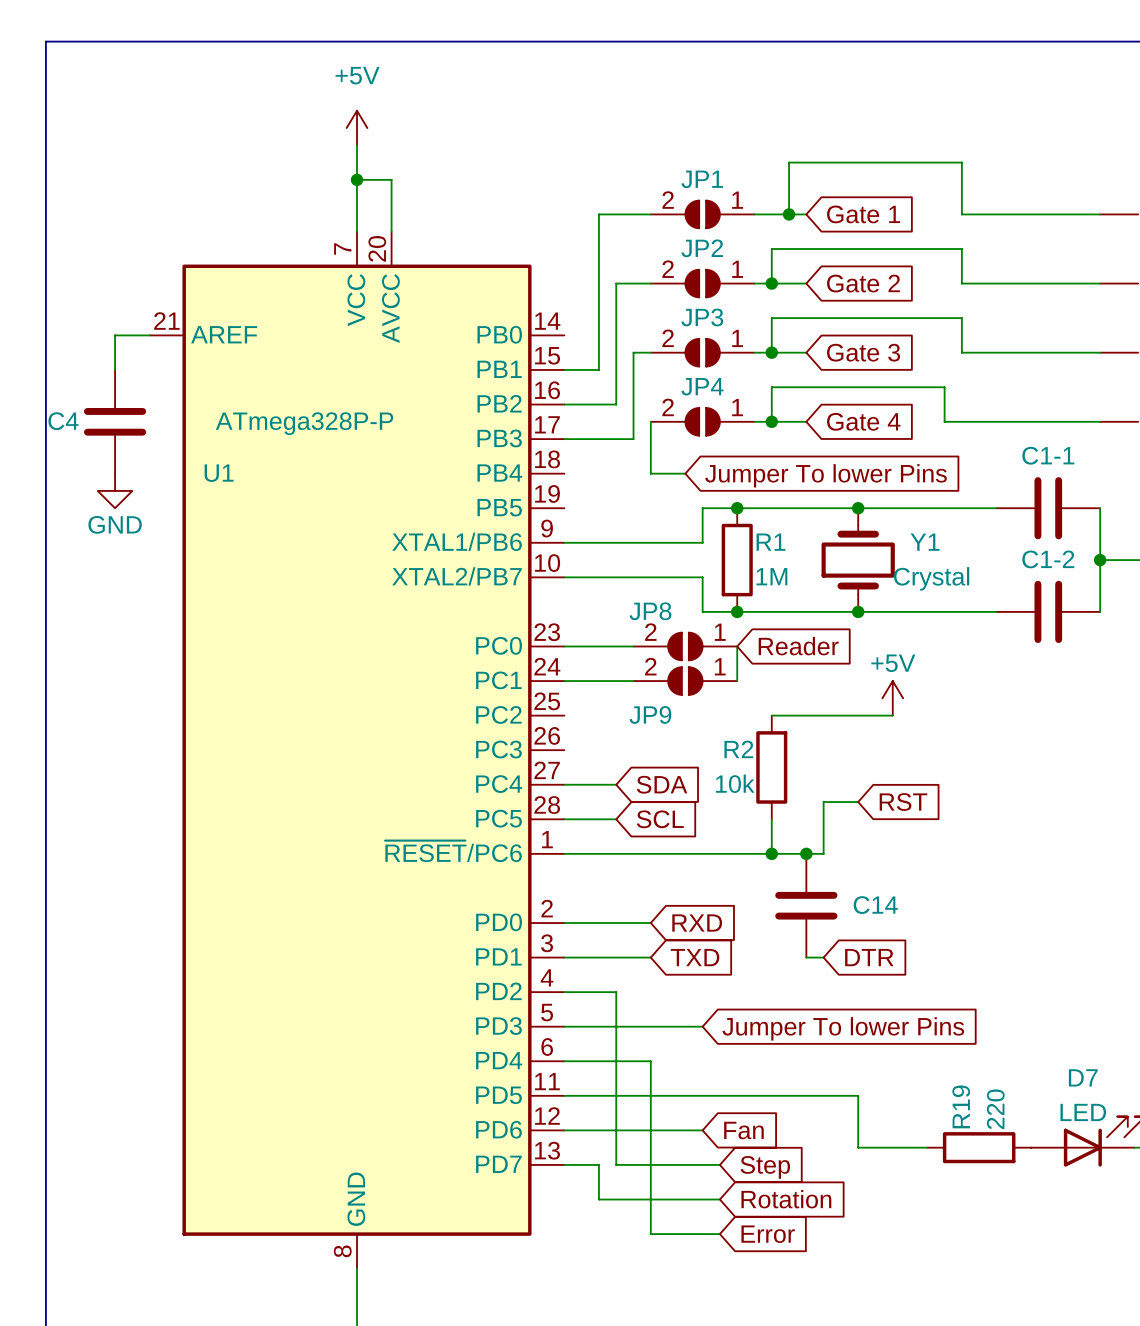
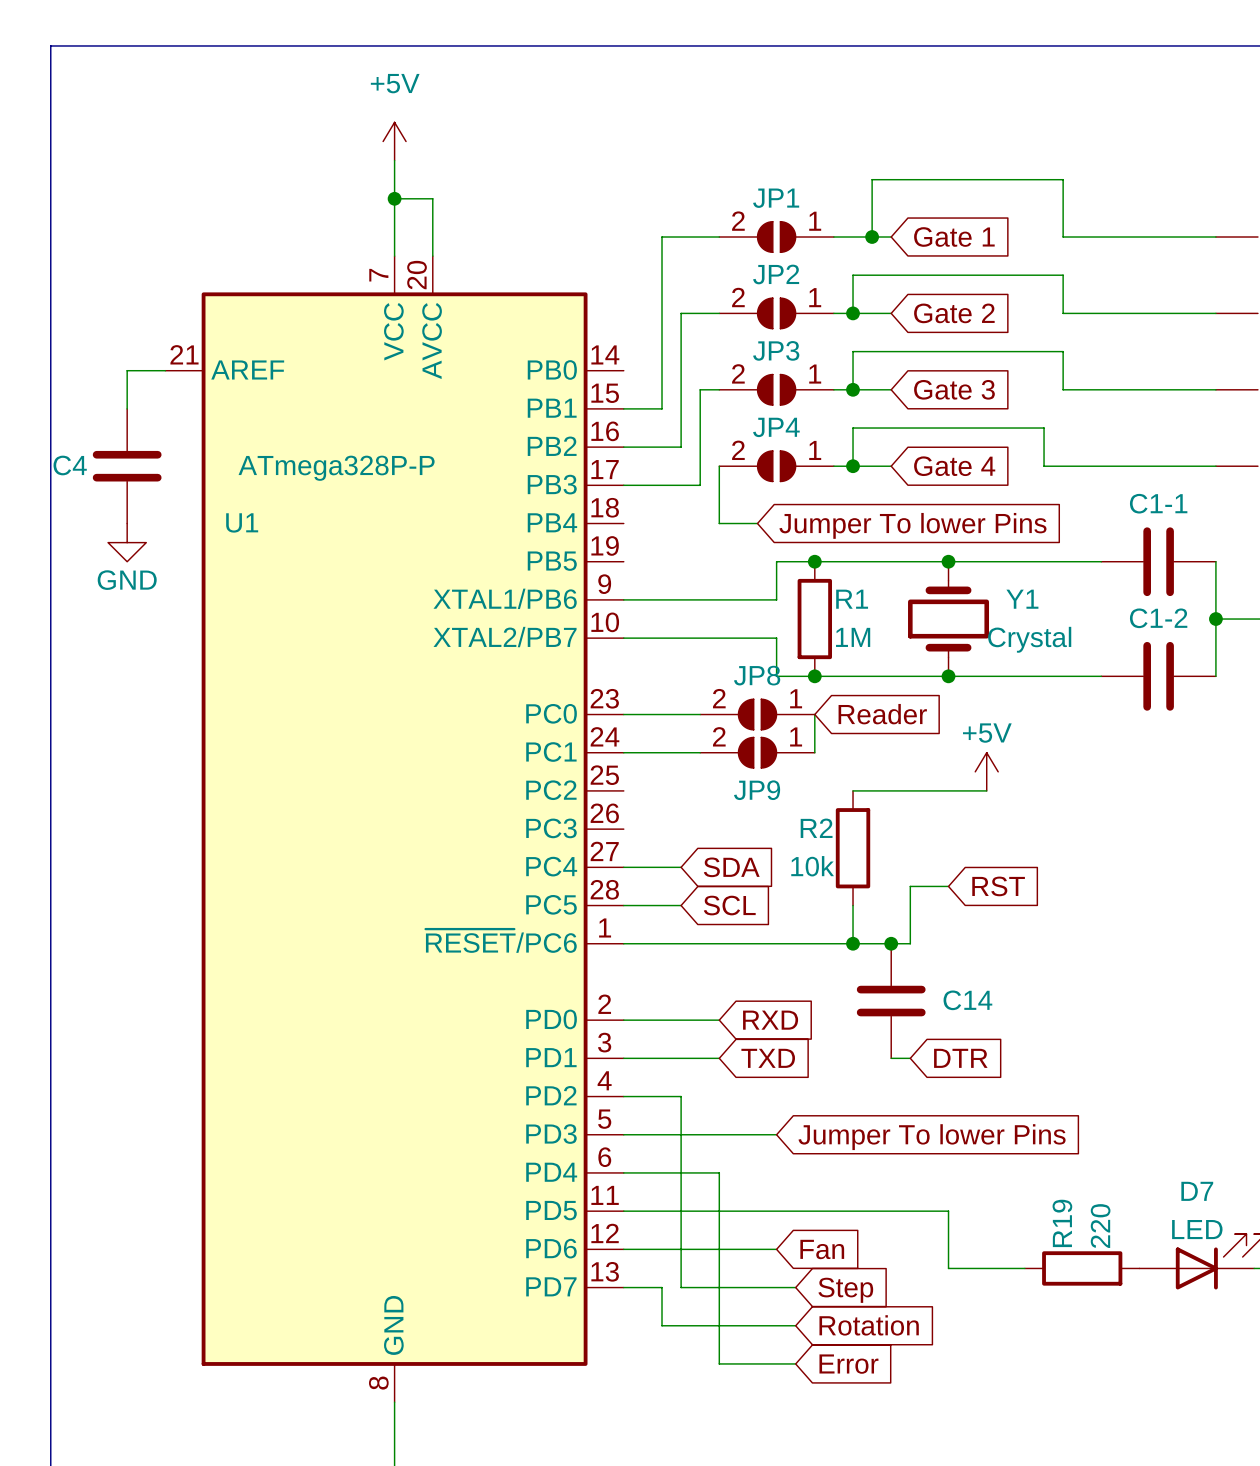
JP8 name position: JP8 (650, 611) -> JP8 (757, 675)
JP9 name position: JP9 (650, 714) -> JP9 (757, 790)

